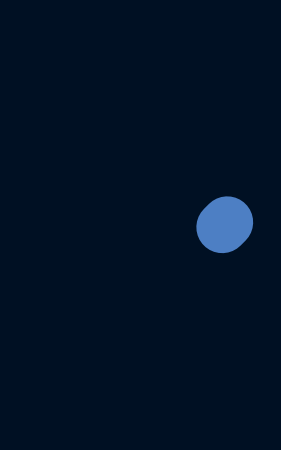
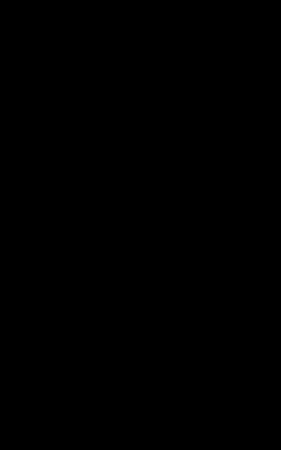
track: (227, 222) (222, 227) -> none

